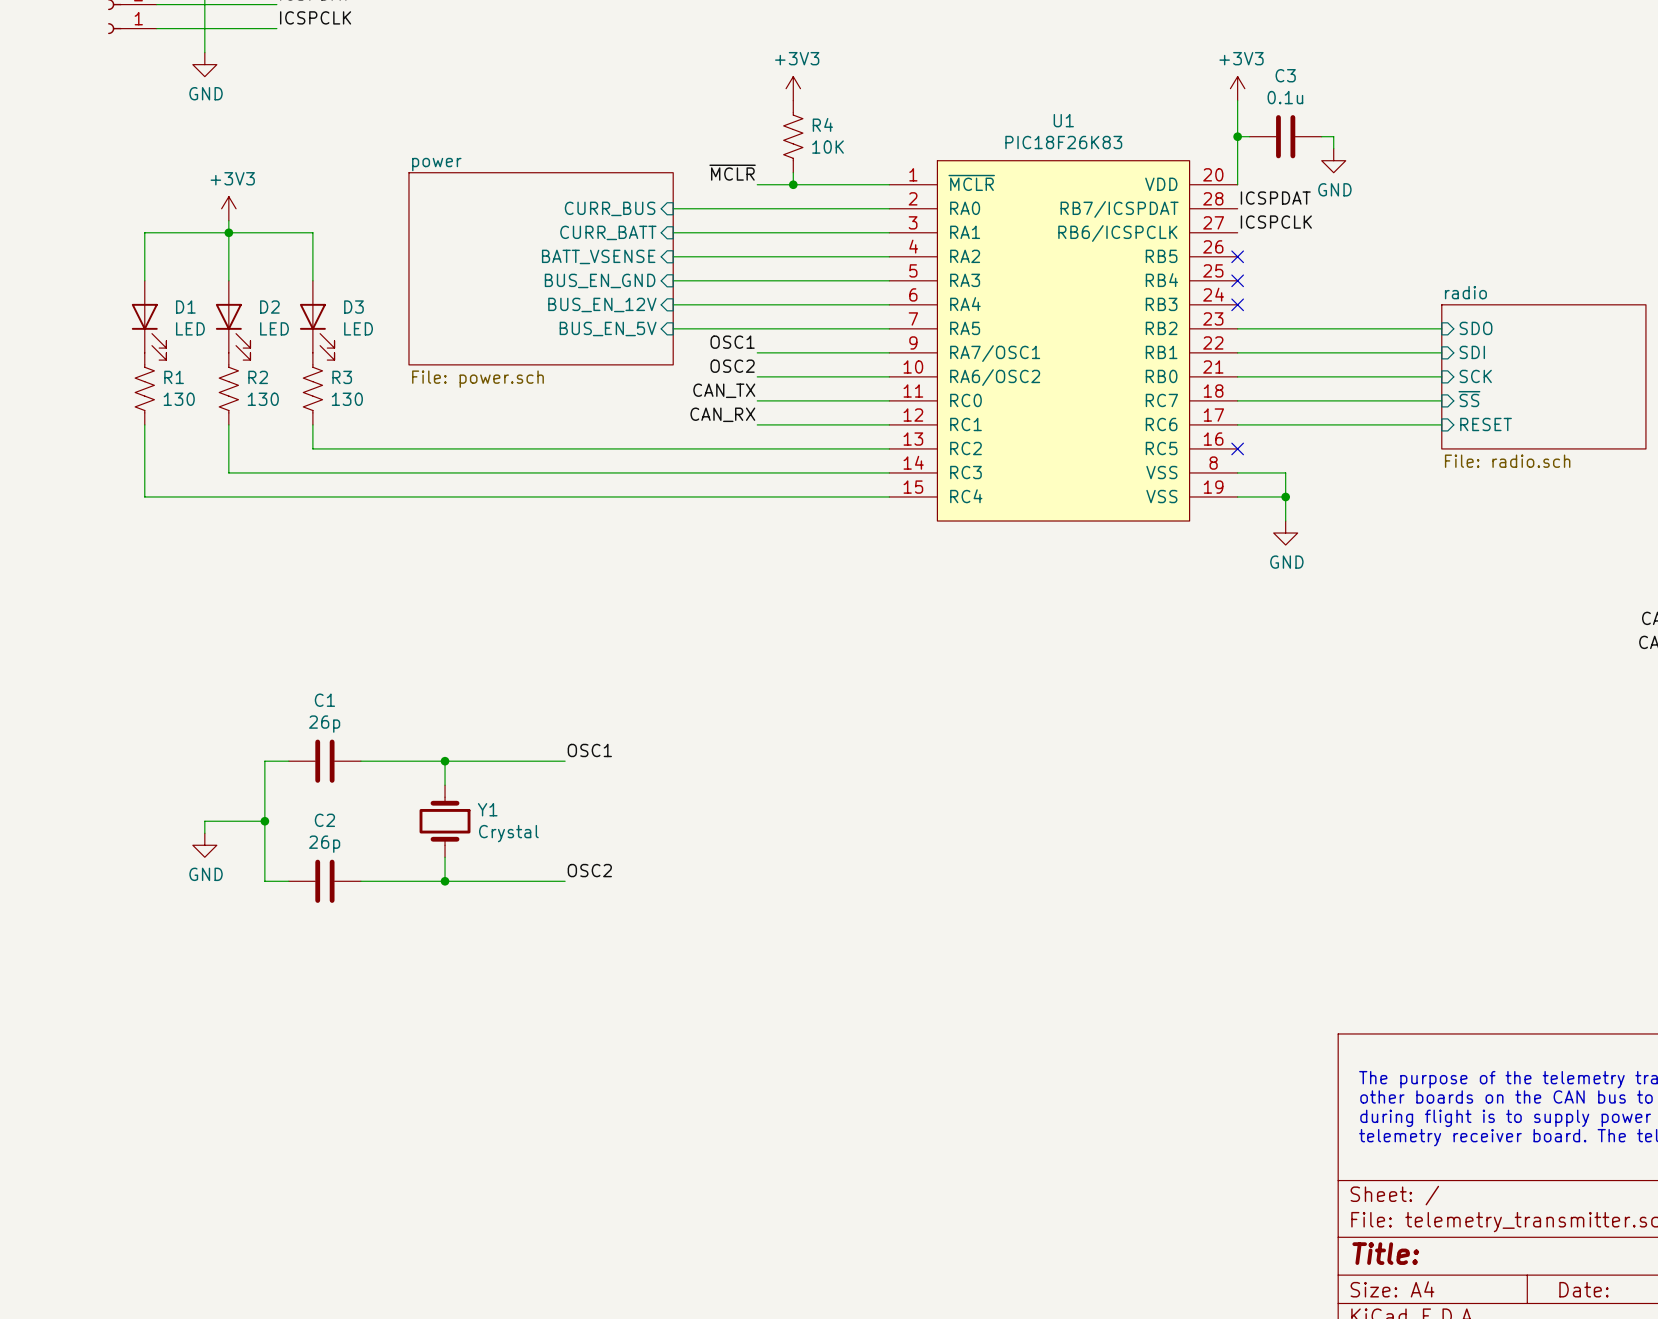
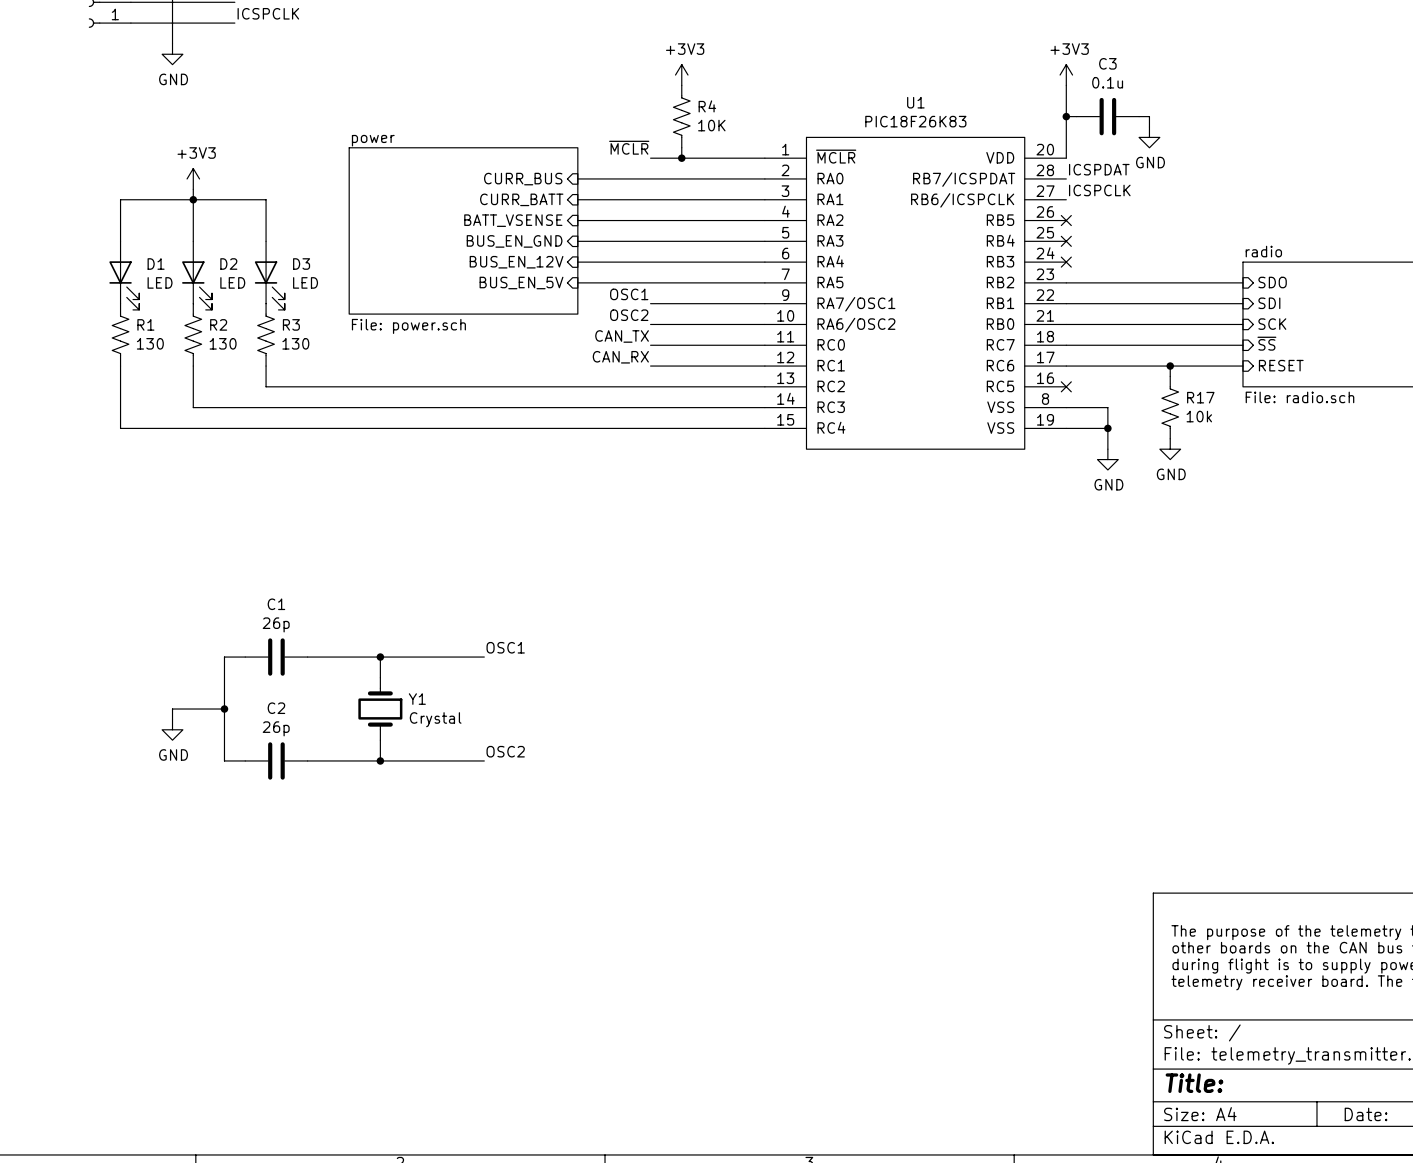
wire: none -> (1170, 366) (1170, 376)
junction: none -> (1170, 366)
R17: none -> 10k (1170, 407)
power symbol: none -> GND (1170, 449)

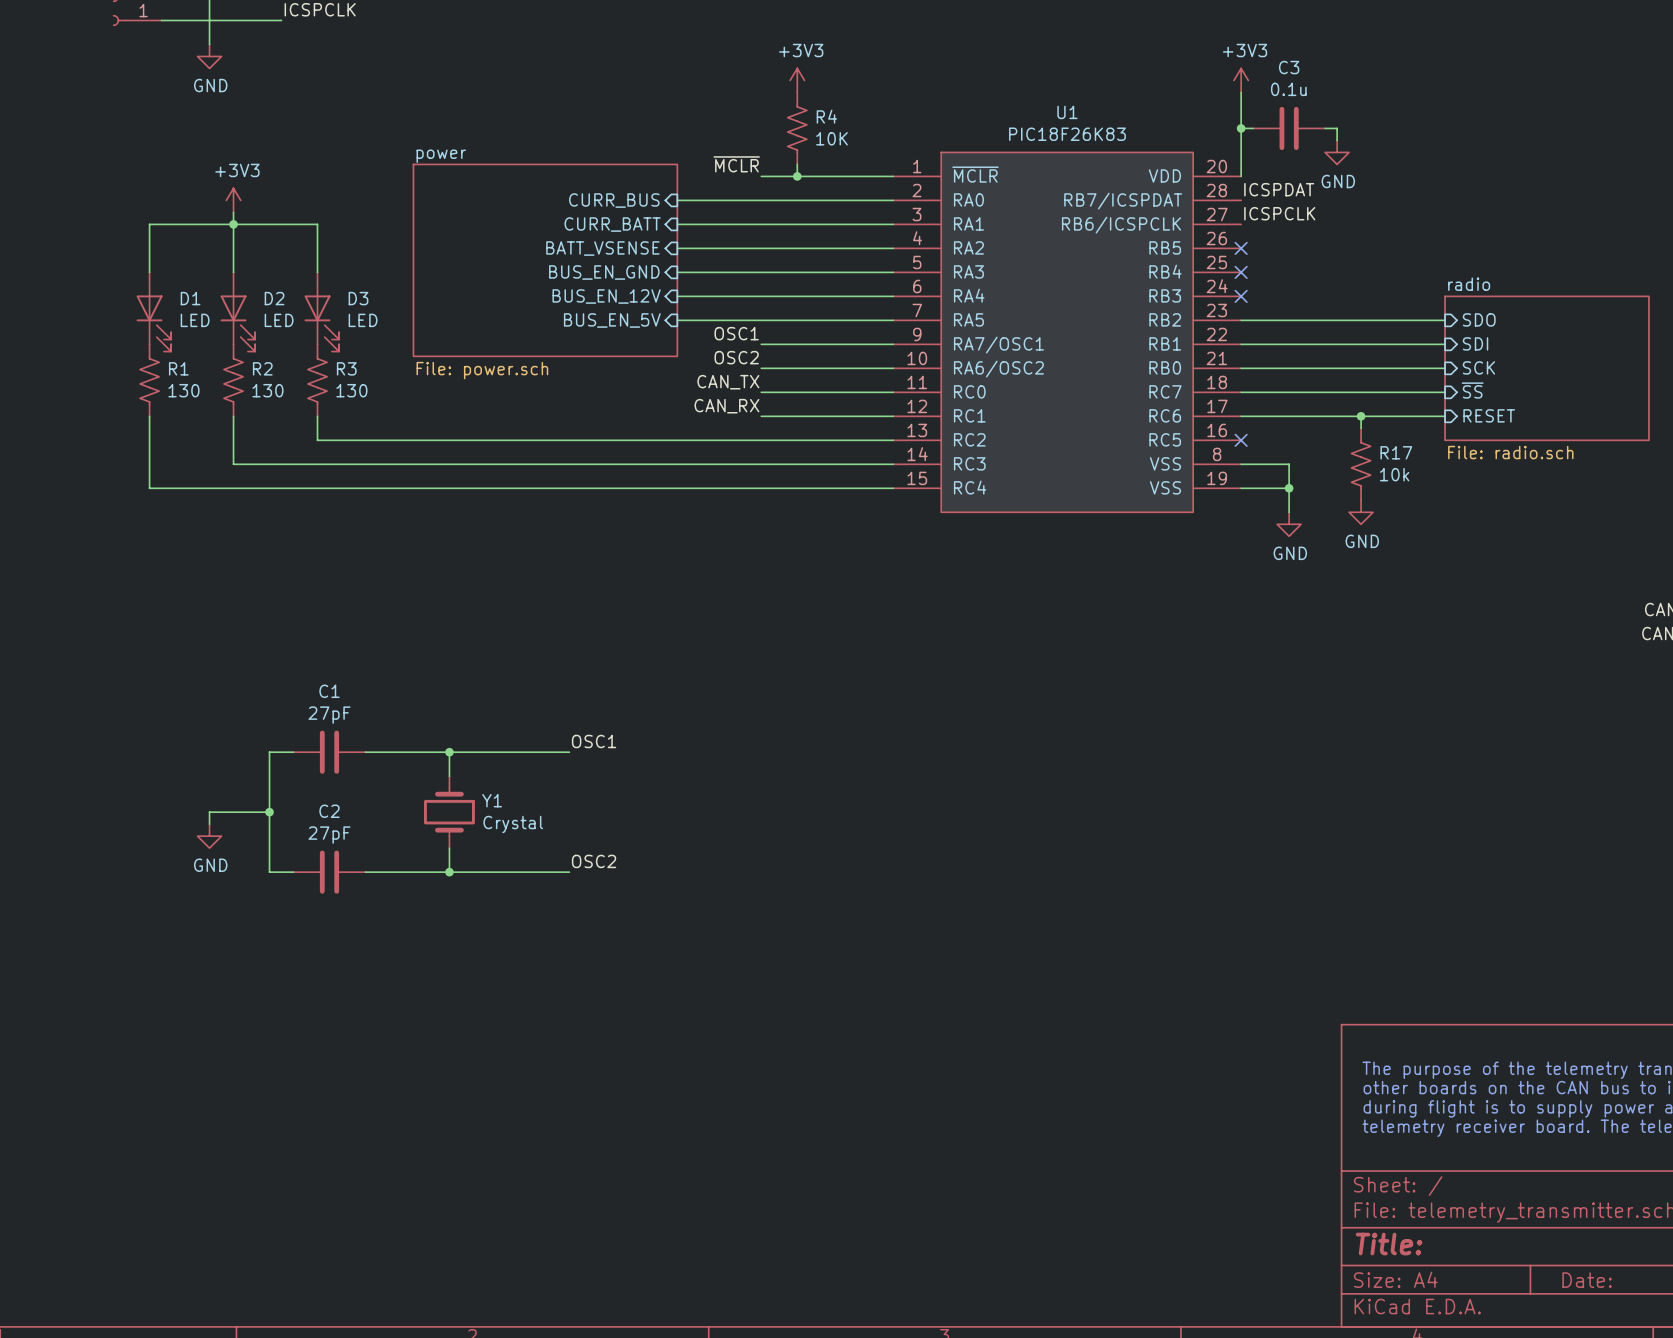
C1 value: 26p (276, 624) -> 27pF (329, 715)
C2 value: 26p (276, 728) -> 27pF (329, 835)

